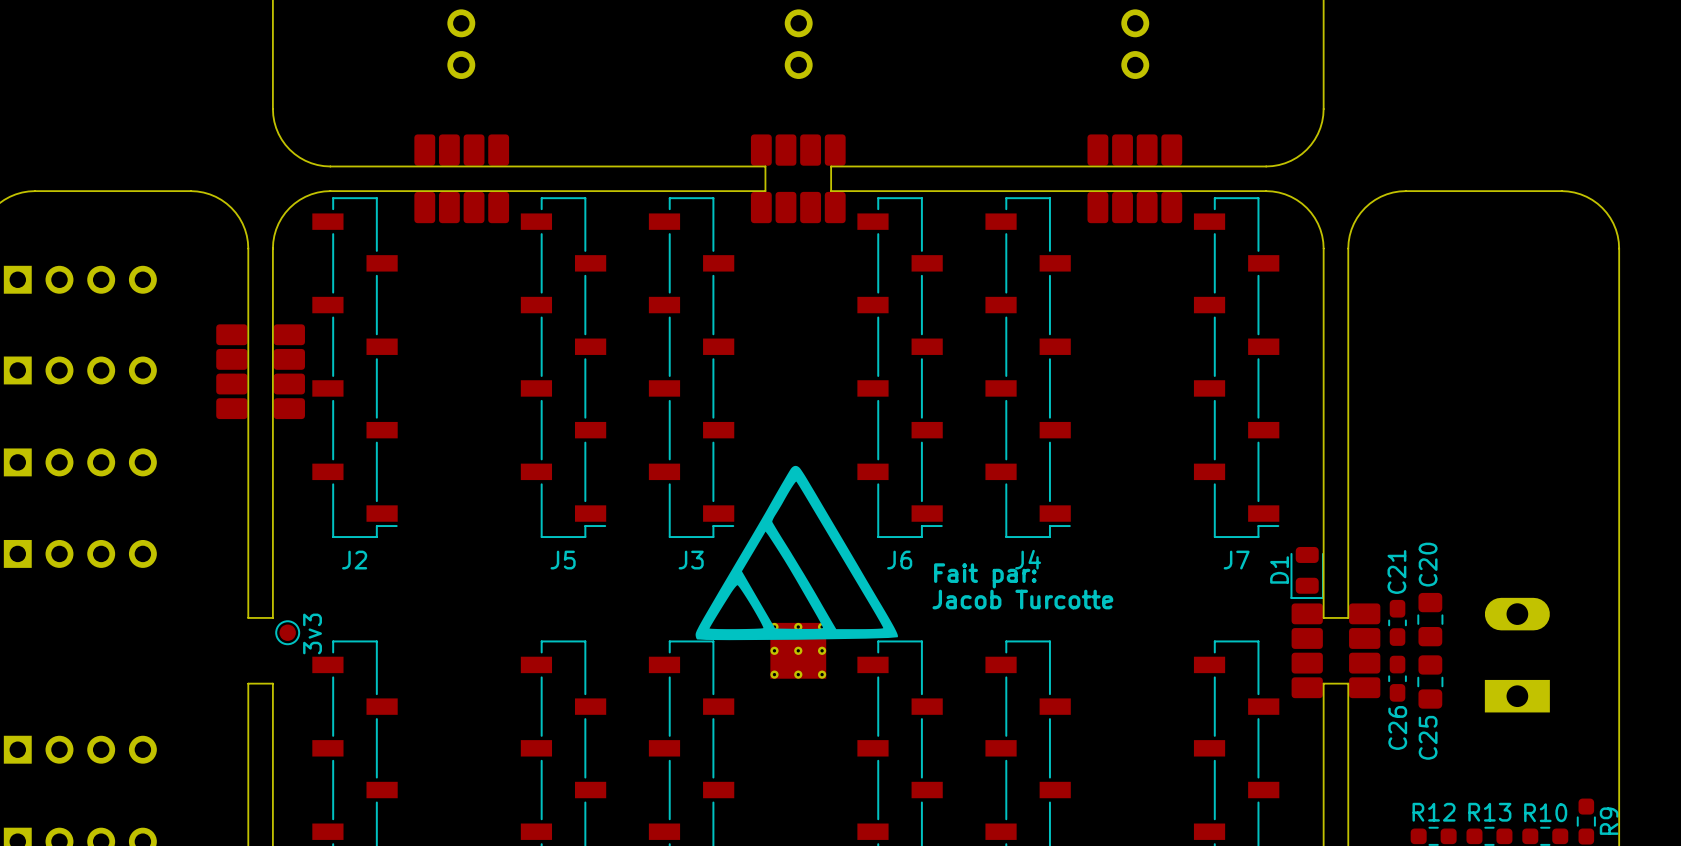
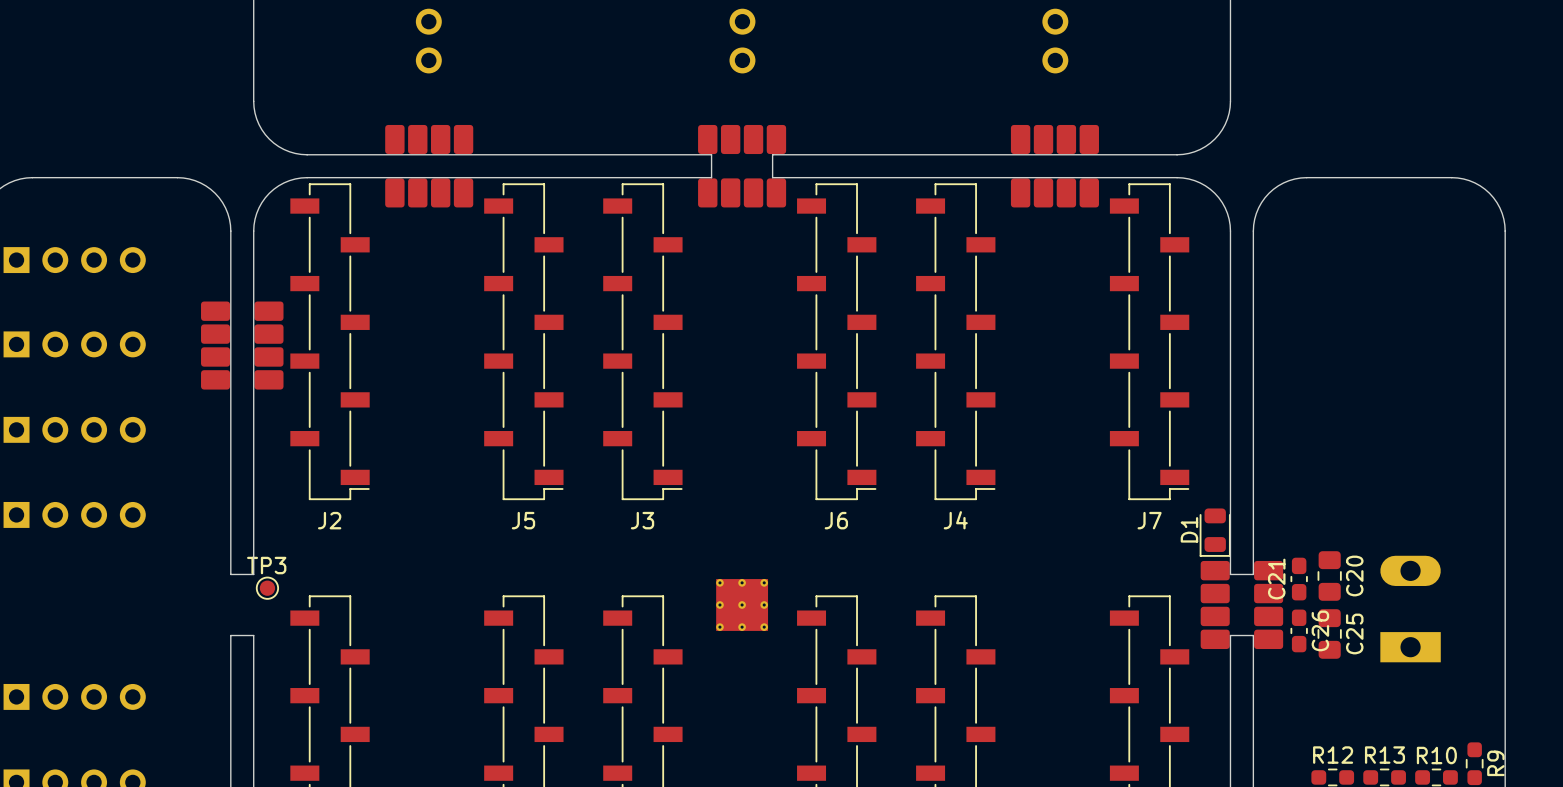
drawing: [695, 465, 898, 641] -> none
C20 name position: C20 (1428, 564) -> C20 (1354, 575)
C21 name position: C21 (1396, 572) -> C21 (1276, 579)
text: Fait par: (985, 575) -> none
text: Jacob Turcotte (1022, 599) -> none
3v3 name: 3v3 (312, 633) -> TP3 (266, 565)
C26 name position: C26 (1397, 727) -> C26 (1320, 630)
C25 name position: C25 (1428, 737) -> C25 (1354, 633)

